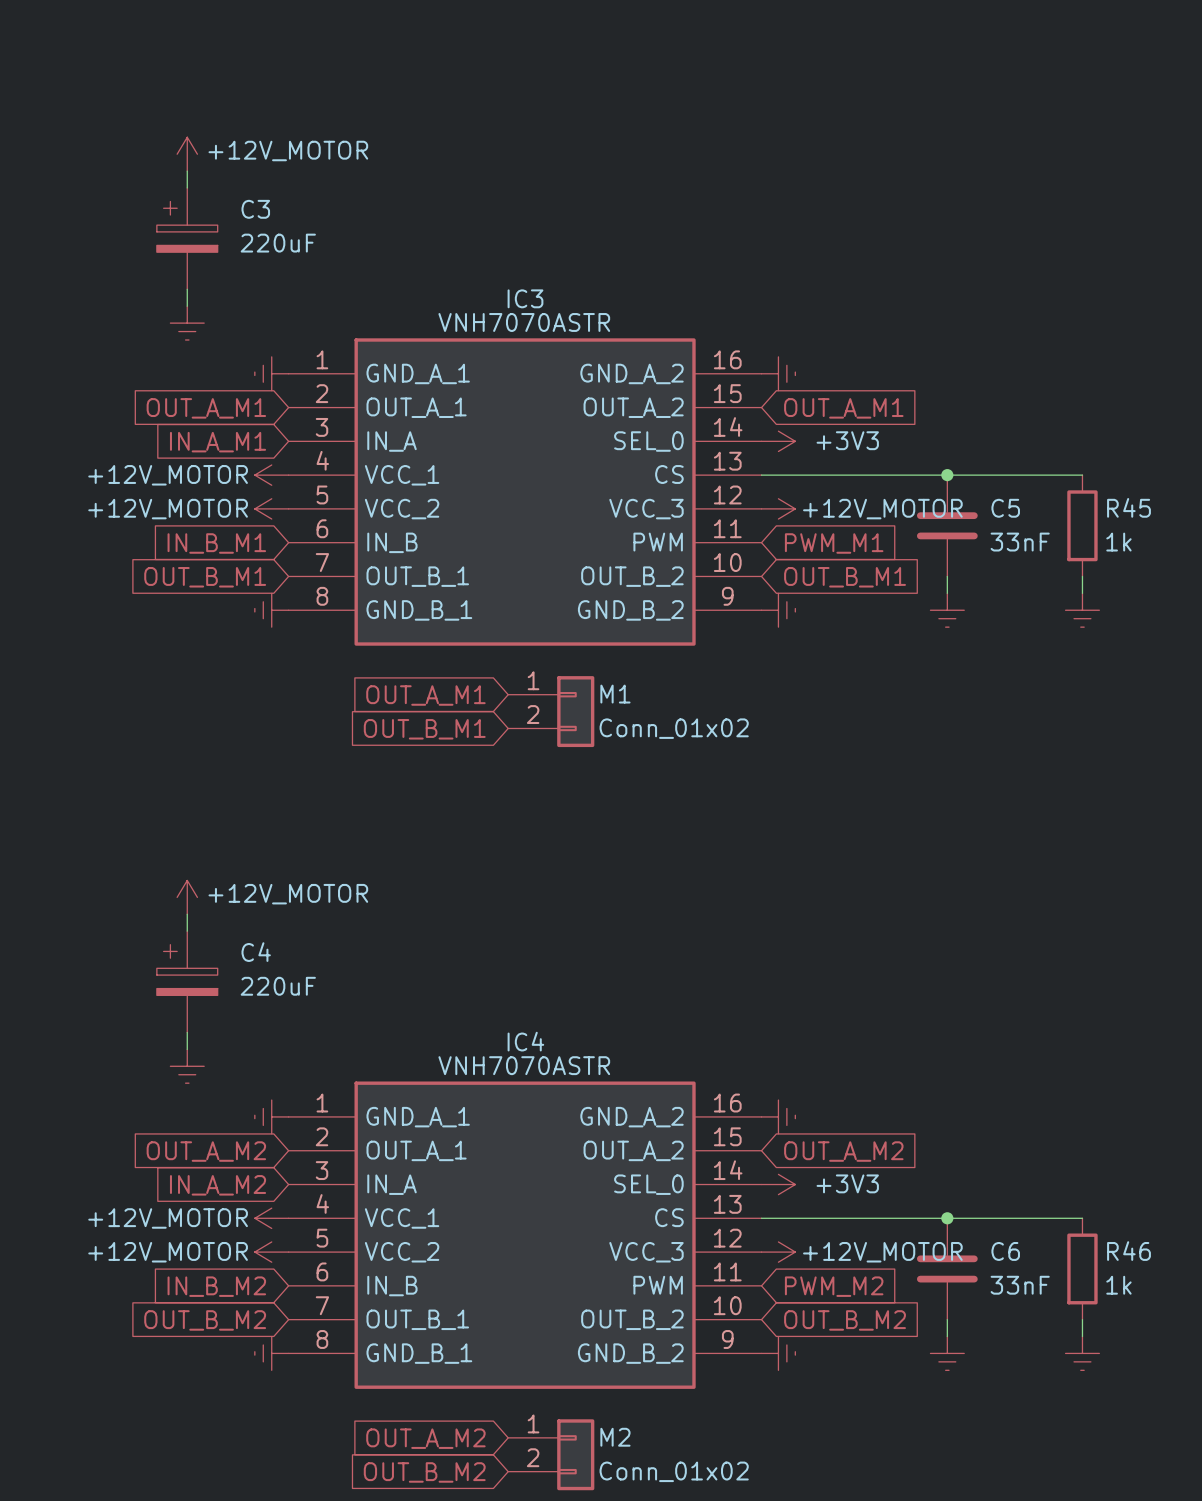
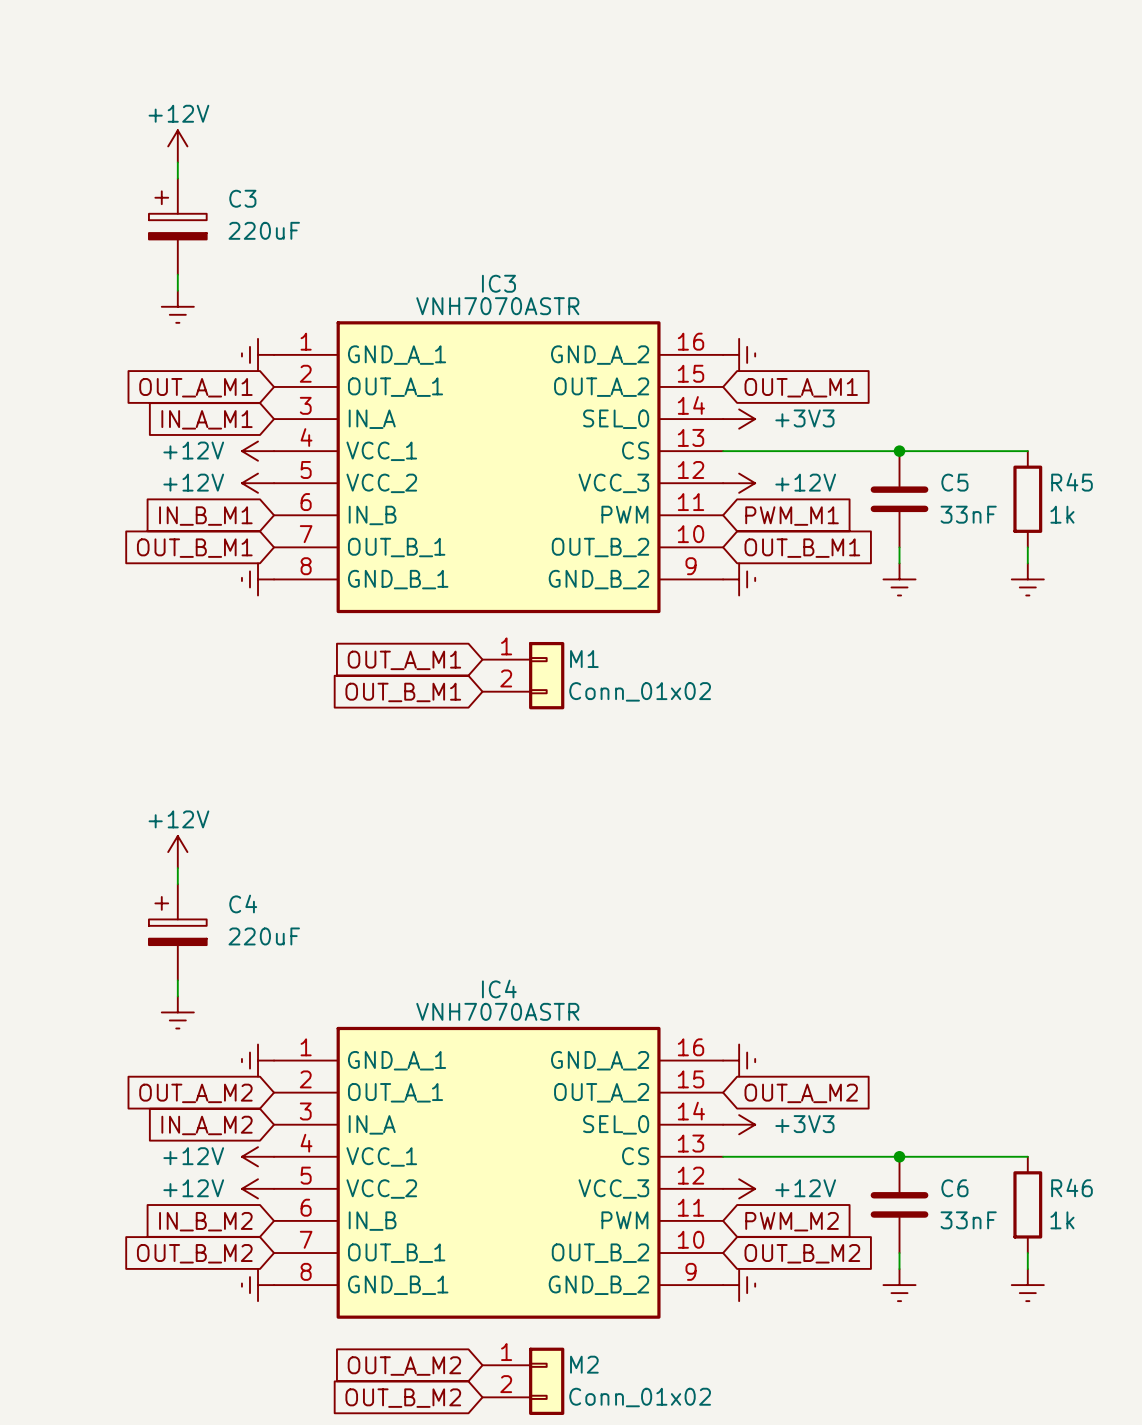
power symbol: +12V_MOTOR (187, 154) -> +12V (177, 146)
power symbol: +12V_MOTOR (271, 475) -> +12V (258, 451)
power symbol: +12V_MOTOR (271, 508) -> +12V (258, 483)
power symbol: +12V_MOTOR (778, 508) -> +12V (739, 483)
power symbol: +12V_MOTOR (187, 897) -> +12V (177, 852)
power symbol: +12V_MOTOR (271, 1218) -> +12V (258, 1156)
power symbol: +12V_MOTOR (271, 1252) -> +12V (258, 1188)
power symbol: +12V_MOTOR (778, 1252) -> +12V (739, 1188)

